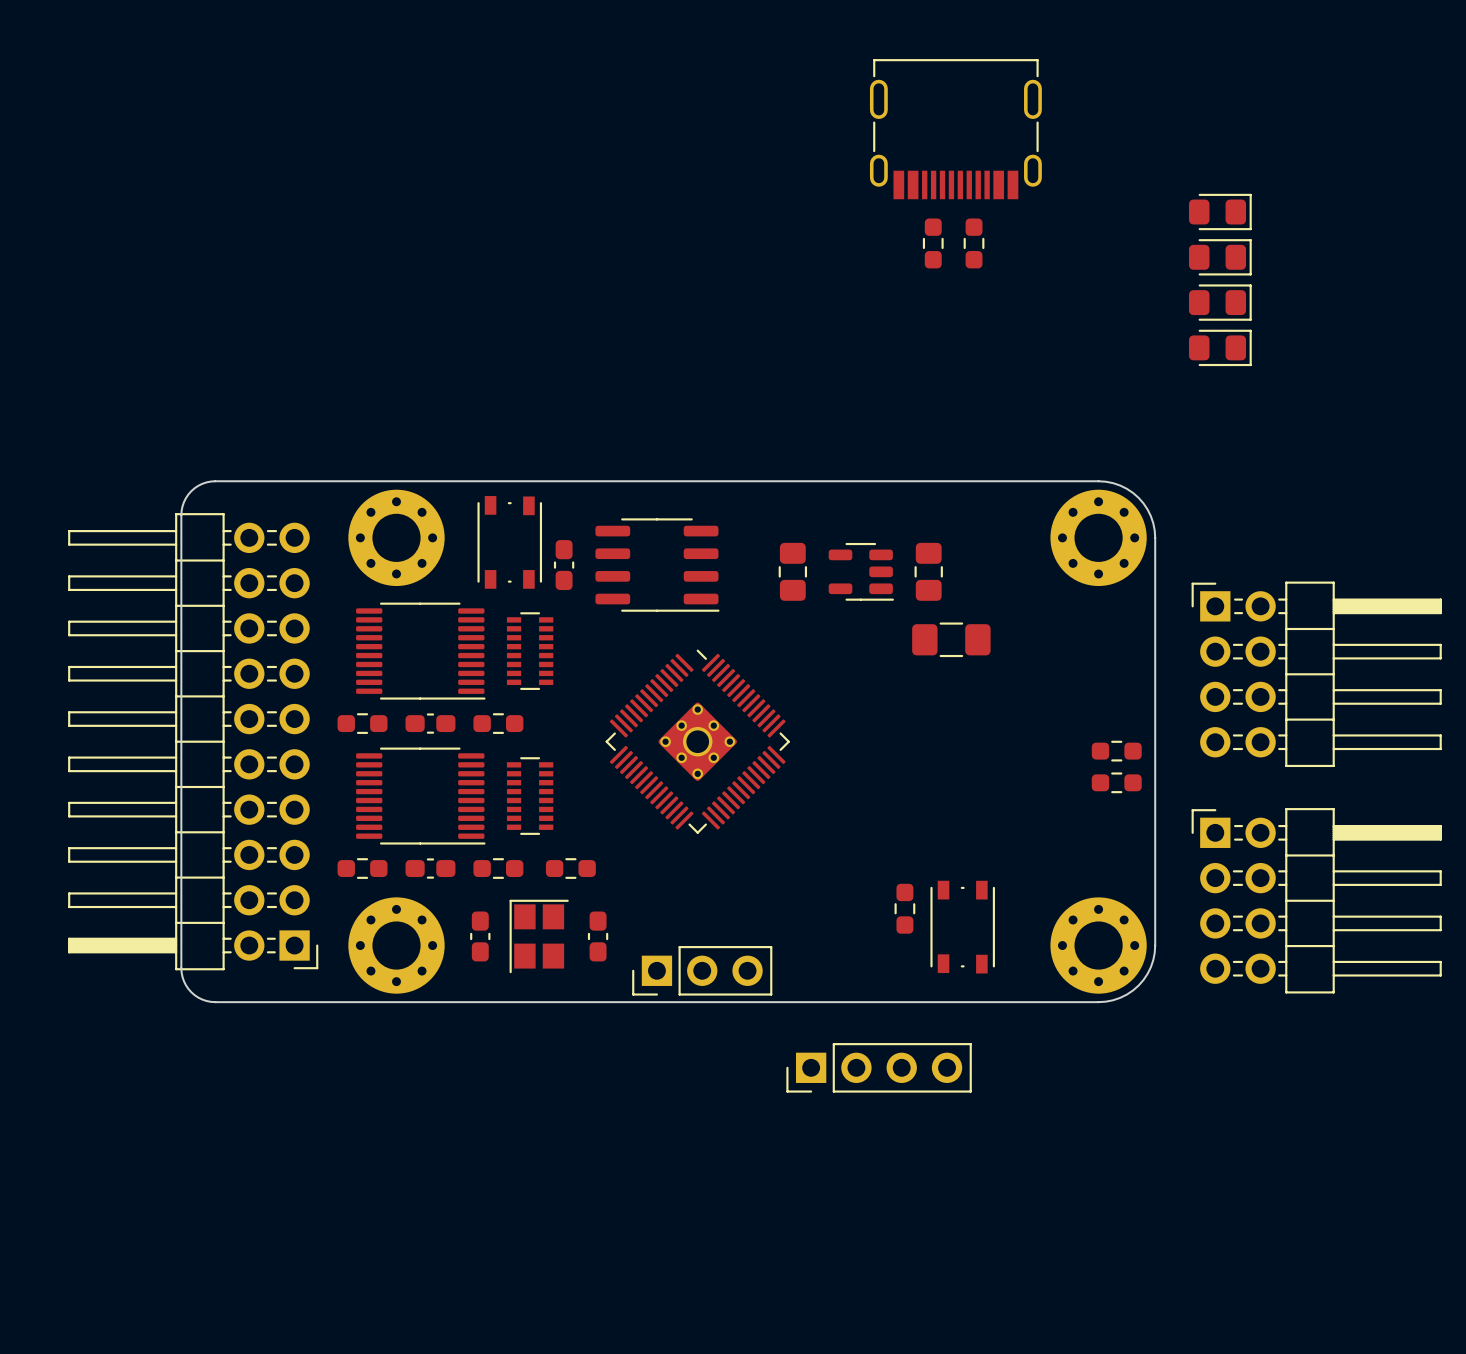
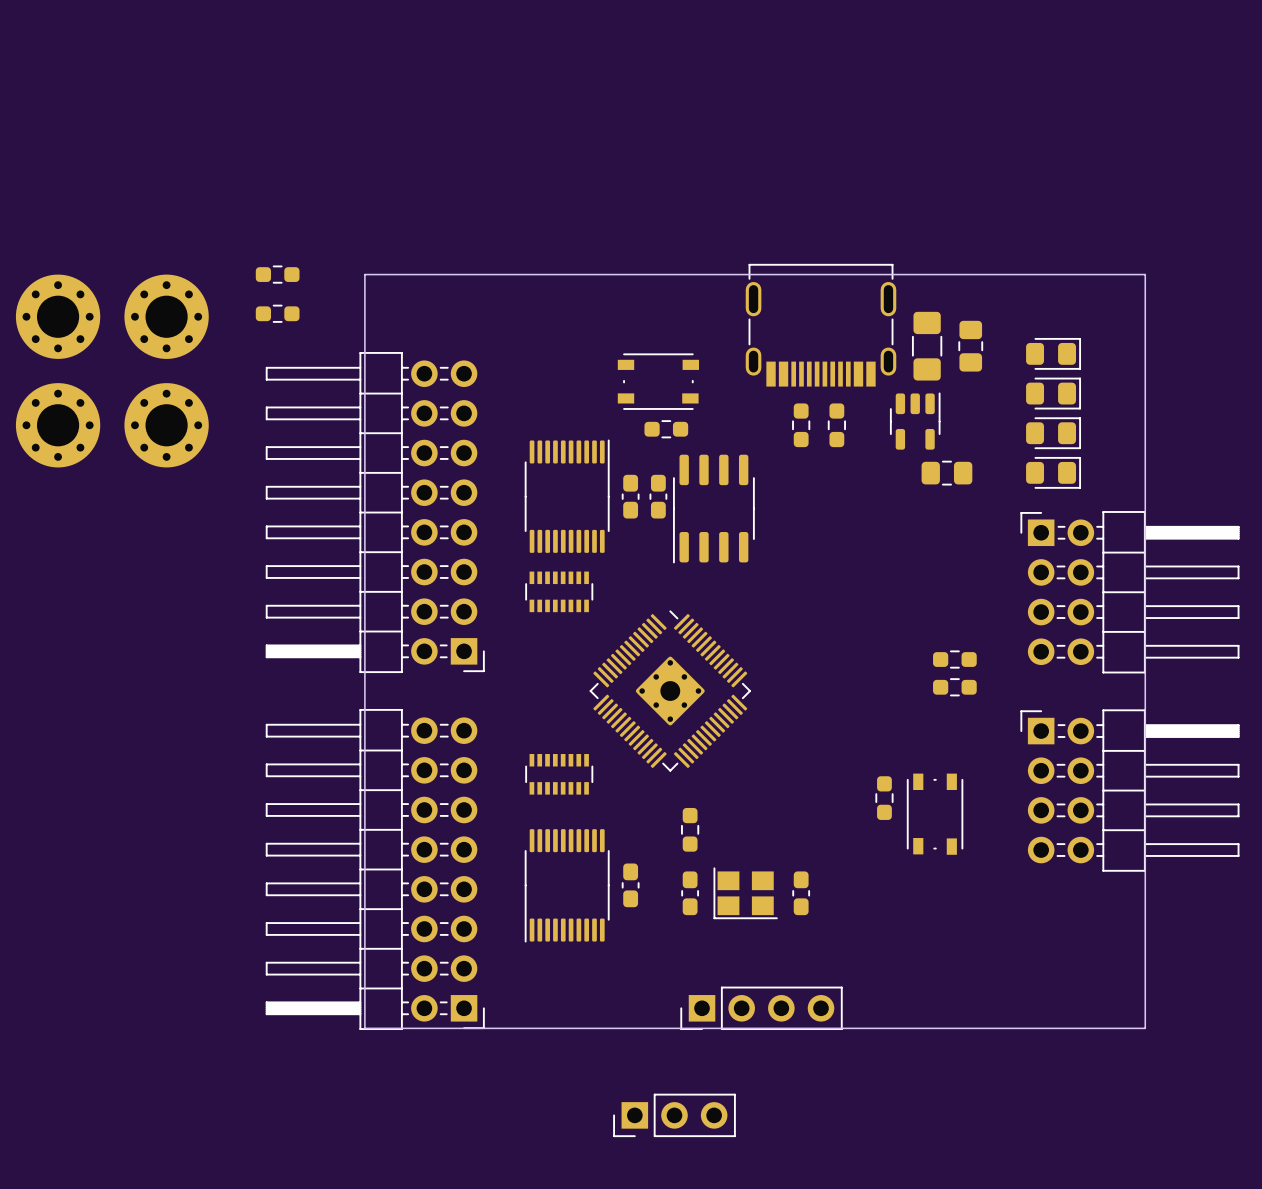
part position: (955, 129) -> (821, 325)
part: (1220, 212) -> none
part: (933, 243) -> none
part: (974, 243) -> none
part: (1220, 257) -> none
part: (1220, 302) -> none
part: none -> (277, 274)
board edge: none -> (364, 274) (1145, 274) (1145, 1028) (364, 1028) (364, 274)
part: (1220, 347) -> none
part: none -> (277, 313)
part: none -> (58, 316)
part: none -> (166, 316)
part: none -> (1053, 353)
part: none -> (658, 381)
part: none -> (1053, 393)
board edge: (215, 481) (1098, 481) (1113, 483) (1126, 488) (1138, 497) (1147, 509) (1153, 523) (1155, 537) (1155, 945) (1153, 960) (1147, 973) (1138, 985) (1126, 994) (1113, 1000) (1098, 1002) (215, 1002) (198, 997) (185, 985) (181, 968) (181, 515) (183, 502) (191, 491) (202, 483) (215, 481) -> none
part: none -> (58, 425)
part: none -> (166, 425)
part: none -> (801, 425)
part: none -> (836, 425)
part: none -> (666, 429)
part footprint: [1050, 489, 1147, 587] -> [921, 460, 973, 486]
part: none -> (1053, 433)
part footprint: [595, 518, 720, 612] -> [524, 439, 610, 553]
part: (396, 537) -> none
part: none -> (1053, 472)
part: (509, 542) -> none
part footprint: [778, 542, 808, 601] -> [649, 474, 668, 519]
part: (564, 565) -> none
part: none -> (630, 496)
part rotation: 0° (861, 571) -> 90° counterclockwise (915, 421)
part position: (861, 571) -> (915, 421)
part position: (928, 571) -> (970, 346)
part: none -> (713, 509)
part: none -> (375, 512)
part rotation: 0° (951, 639) -> 90° clockwise (927, 346)
part position: (951, 639) -> (927, 346)
part: (420, 651) -> none
part: (530, 651) -> none
part: none -> (559, 591)
part: (362, 723) -> none
part: (430, 723) -> none
part: (498, 723) -> none
part: (193, 741) -> none
part position: (697, 741) -> (670, 691)
part: (420, 796) -> none
part: (530, 796) -> none
part: (362, 868) -> none
part: (430, 868) -> none
part: (498, 868) -> none
part: (570, 868) -> none
part: none -> (559, 774)
part: (904, 908) -> none
part: none -> (884, 798)
part position: (962, 927) -> (935, 814)
part: (480, 936) -> none
part rotation: 0° (539, 936) -> 90° counterclockwise (745, 893)
part position: (539, 936) -> (745, 893)
part: (598, 936) -> none
part: (396, 945) -> none
part: none -> (690, 829)
part: (1098, 945) -> none
part position: (702, 970) -> (674, 1115)
part: none -> (375, 869)
part: none -> (567, 885)
part: none -> (630, 885)
part: none -> (690, 893)
part: none -> (801, 893)
part position: (879, 1067) -> (761, 1008)

